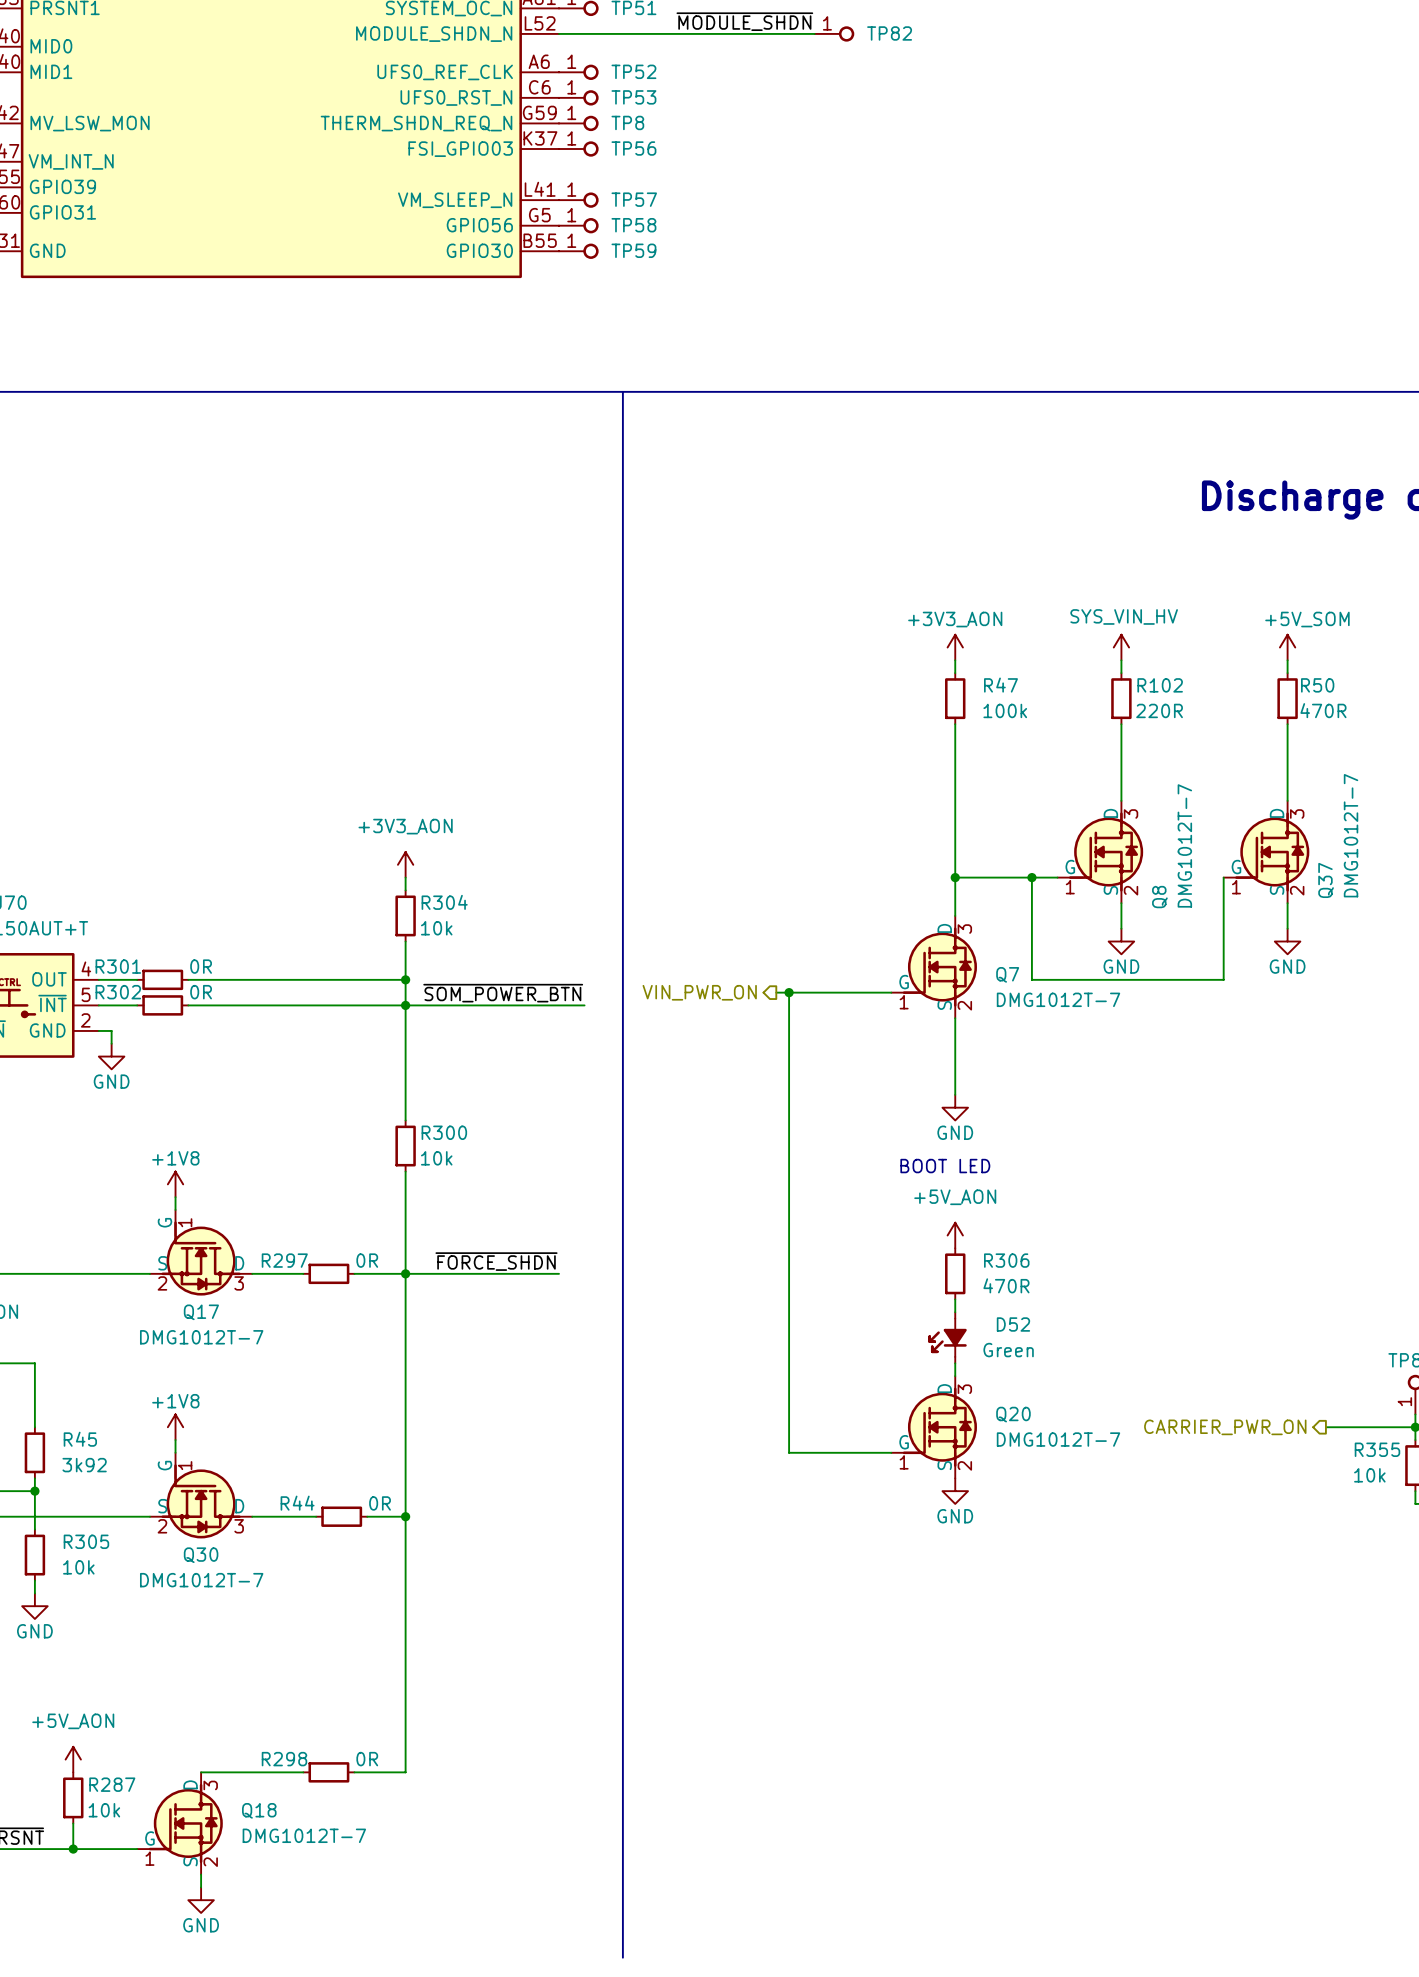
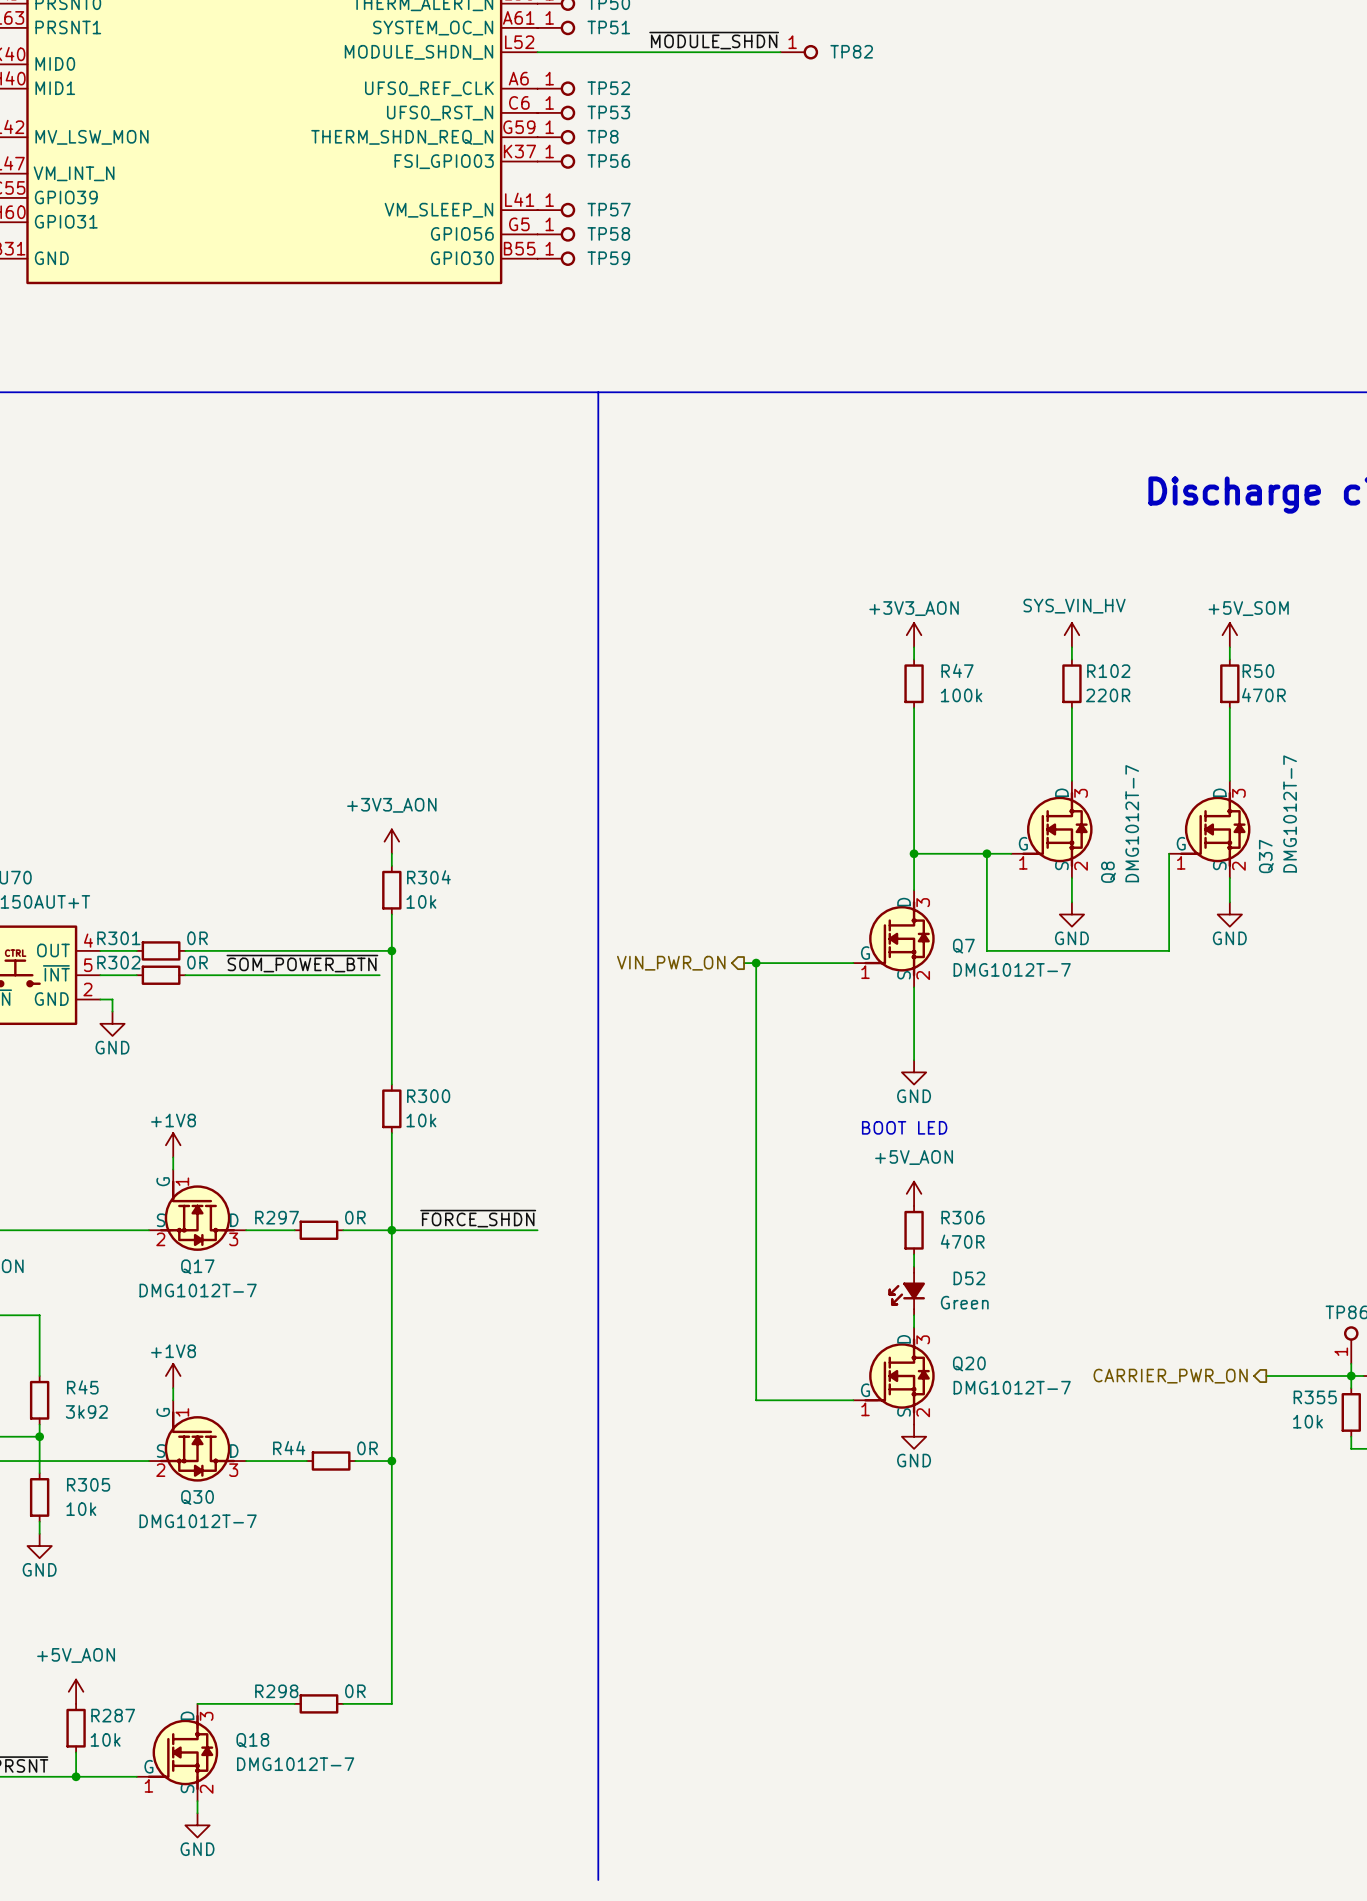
label position: ~{SOM_POWER_BTN} (503, 993) -> ~{SOM_POWER_BTN} (302, 963)
wire: (392, 1005) (584, 1005) -> none
junction: (405, 1005) -> none

